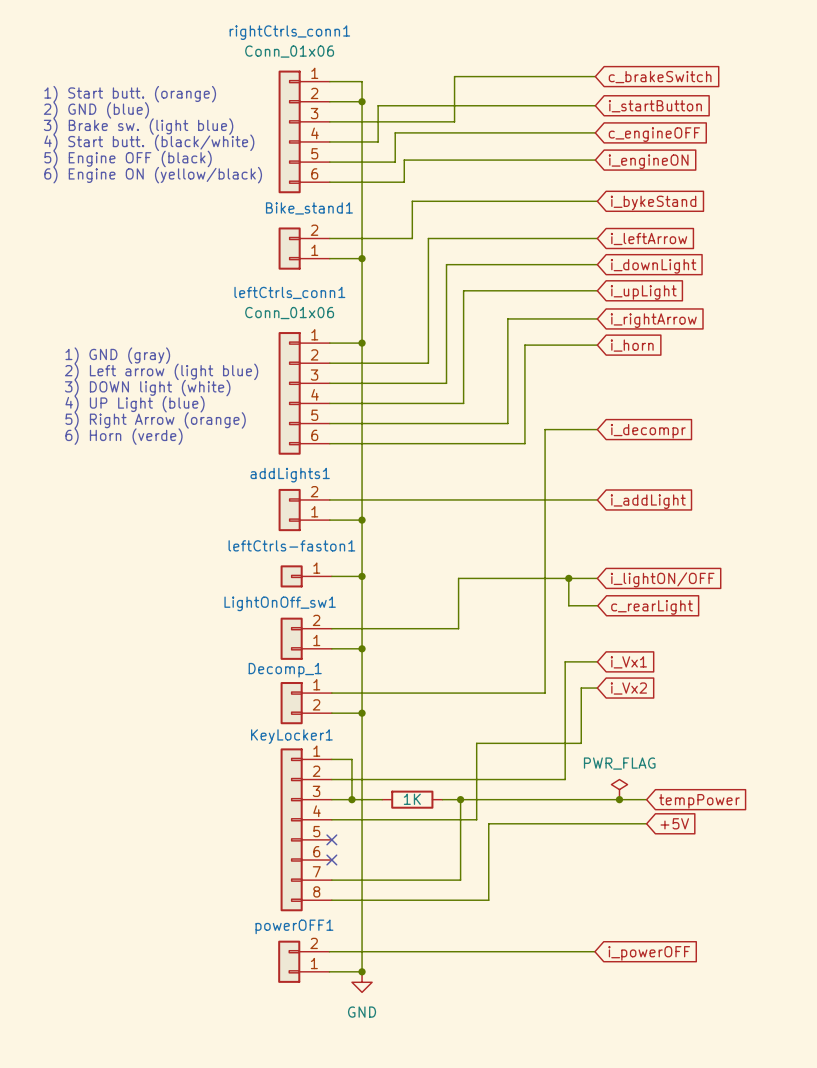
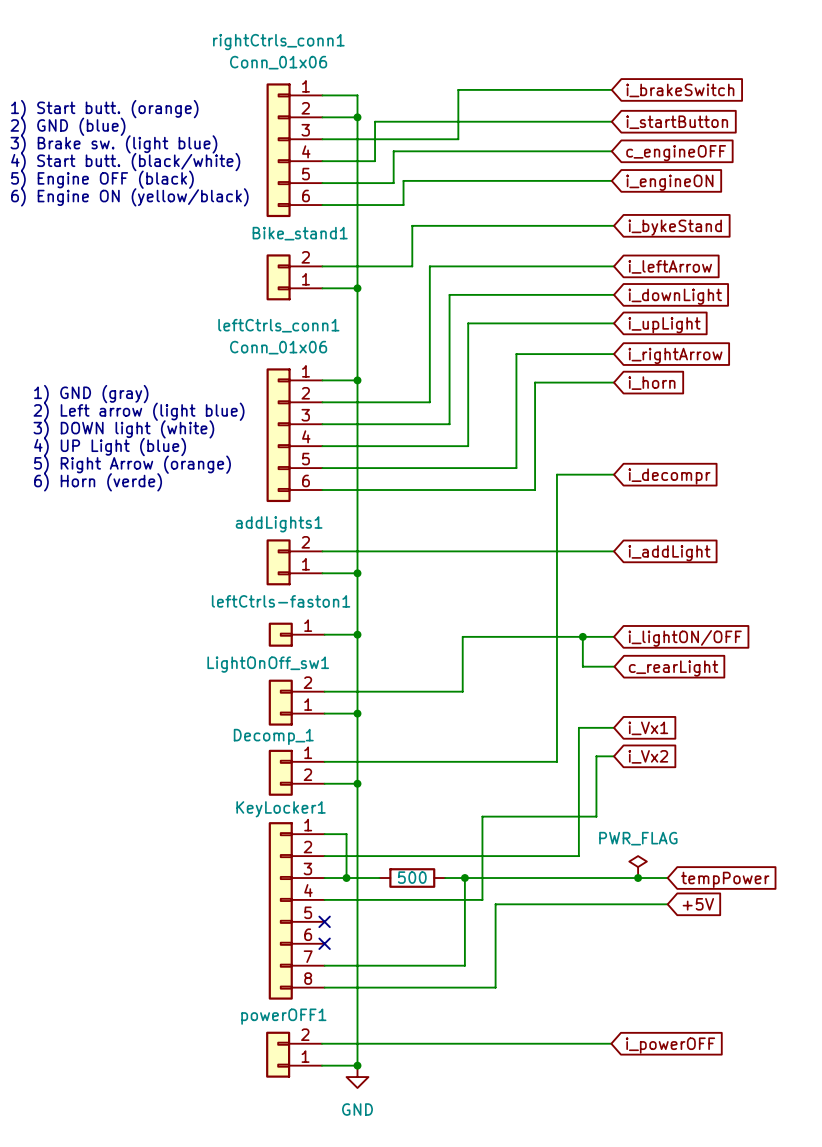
global label: c_brakeSwitch (660, 77) -> i_brakeSwitch (680, 90)
part value: 1K (412, 799) -> 500 (412, 877)

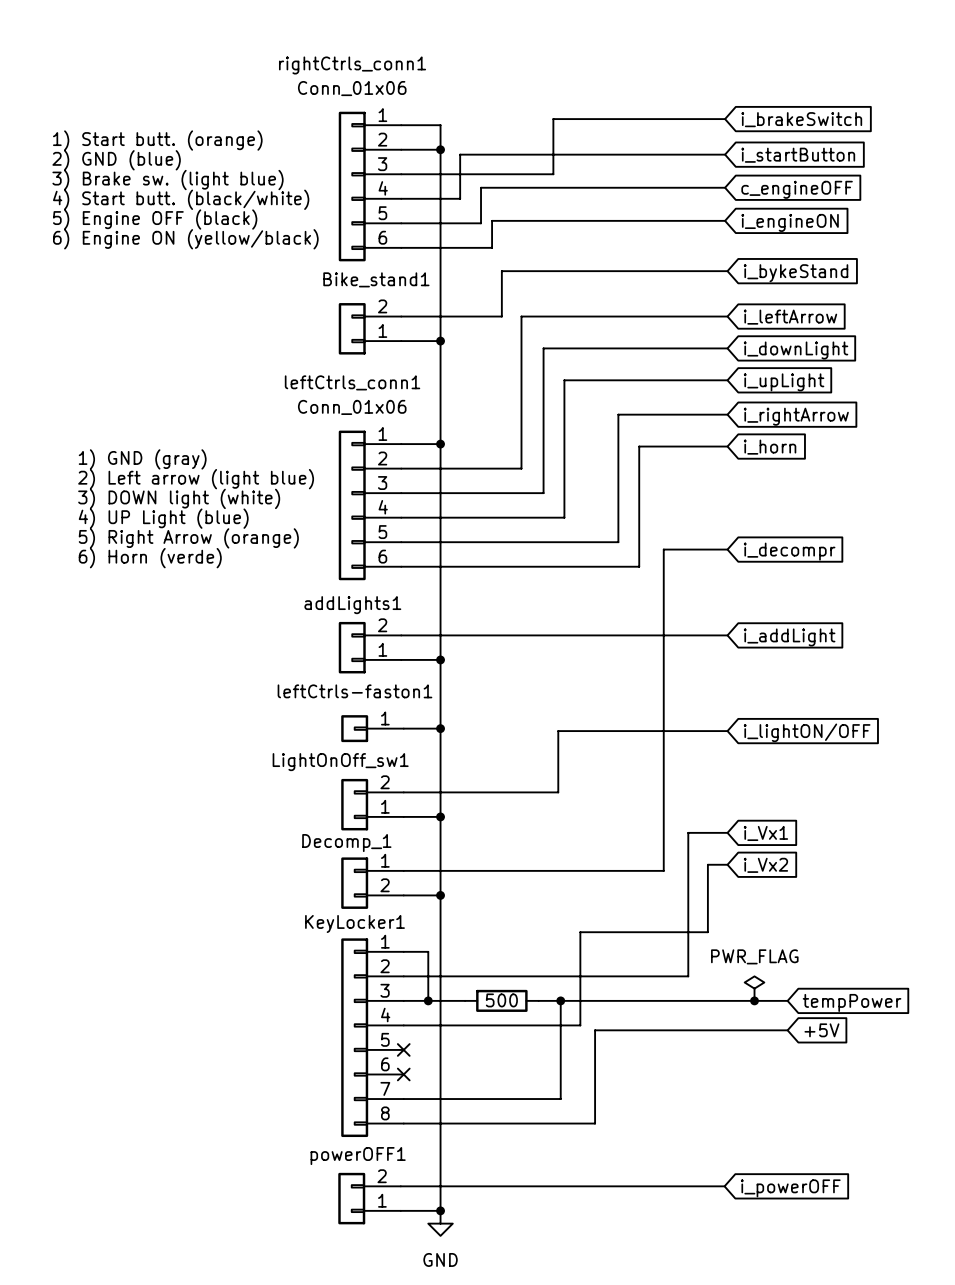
wire: (582, 636) (582, 666) (614, 666) -> none
junction: (582, 636) -> none
global label: c_rearLight (673, 668) -> none

